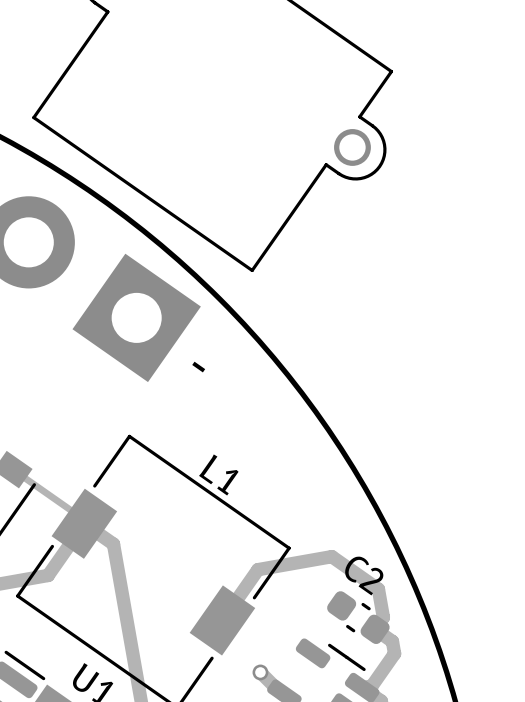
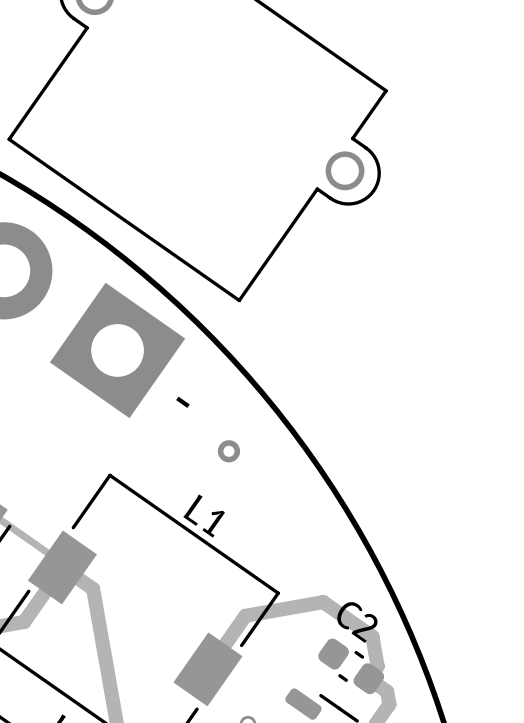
via: none -> (228, 451)

